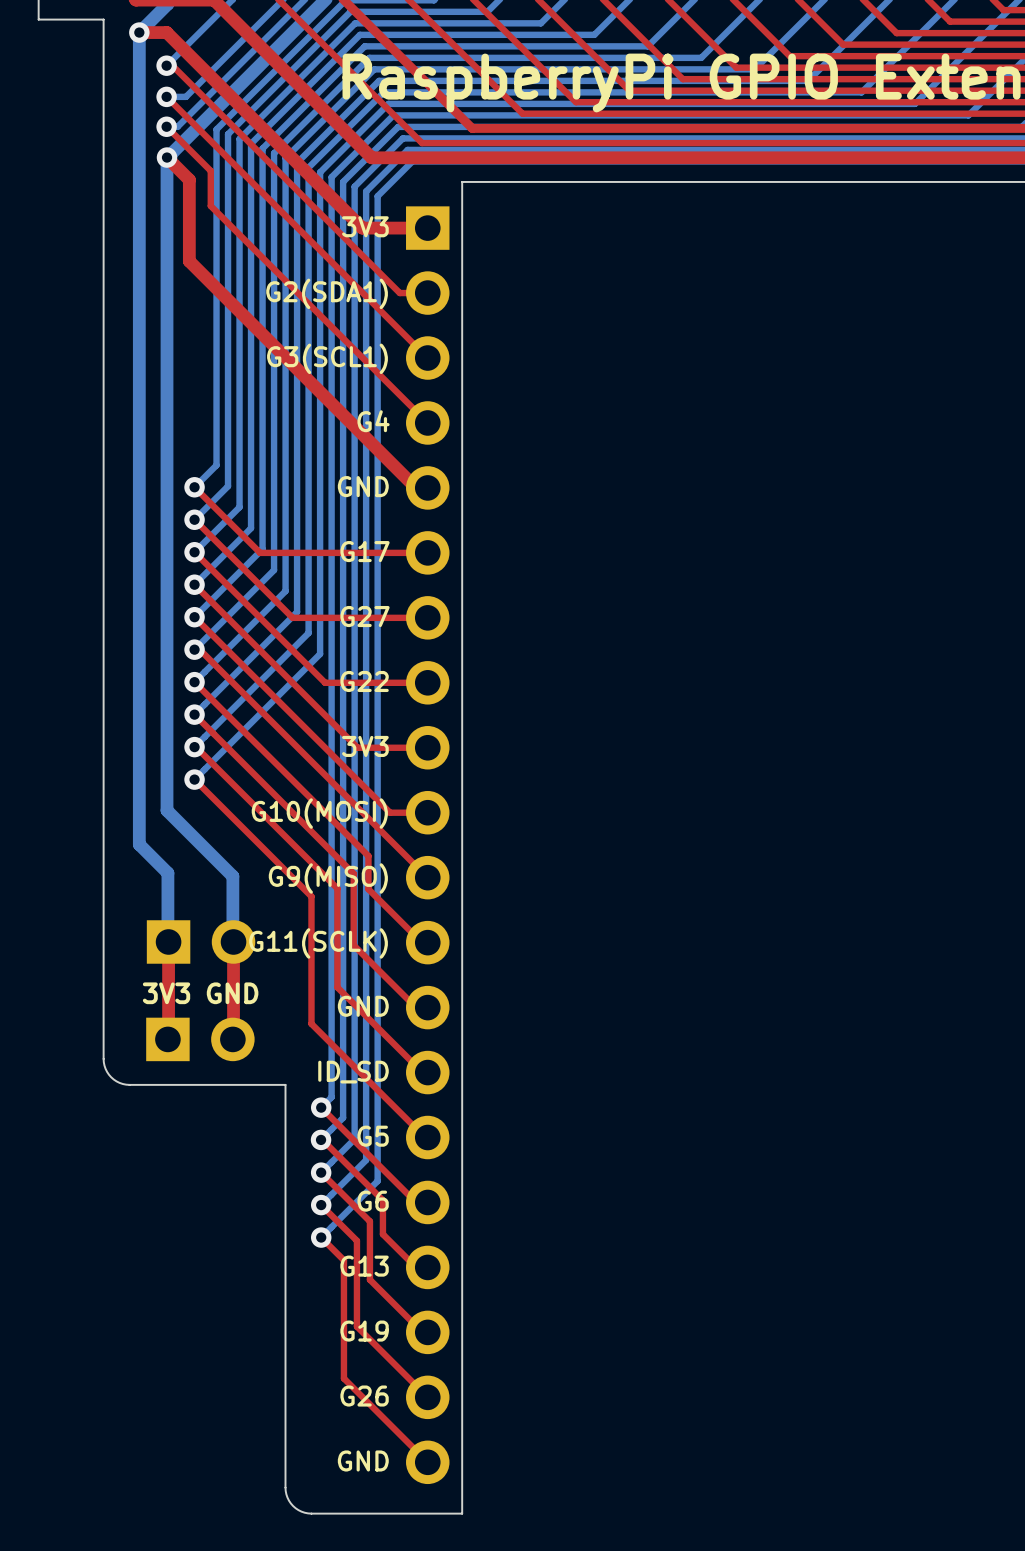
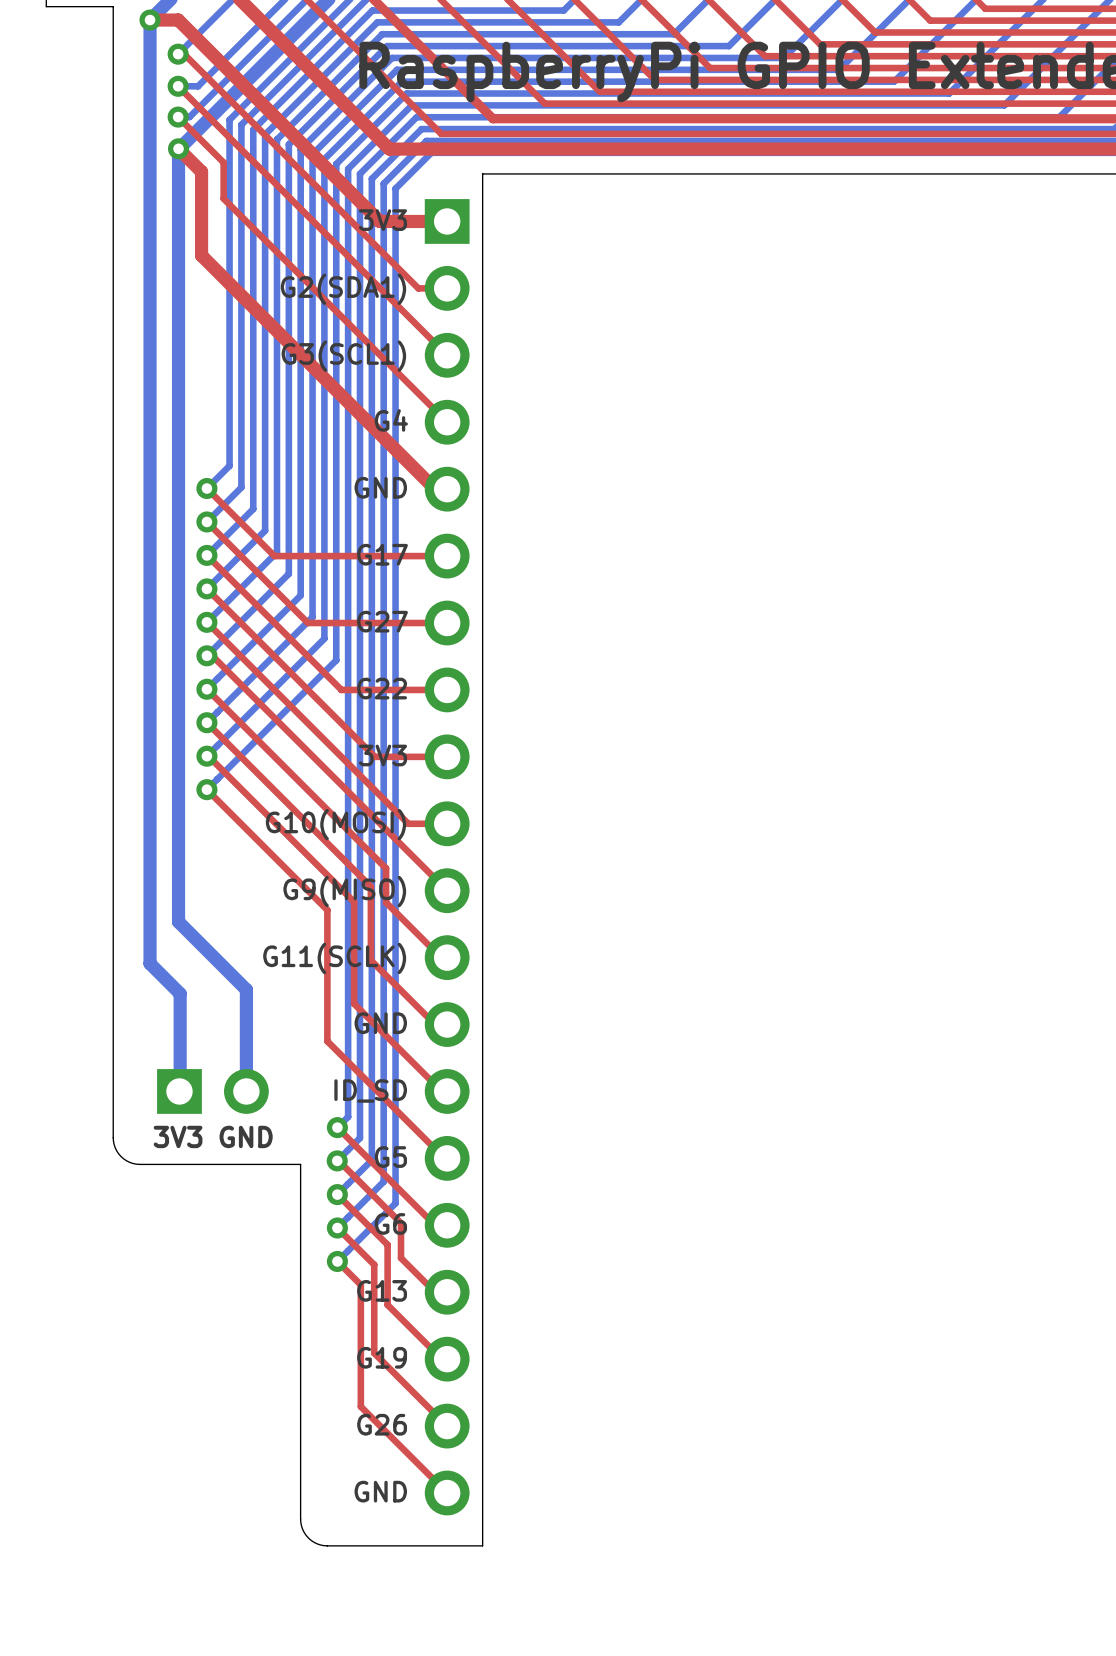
bottom track: (167, 810) (232, 876) (233, 941) -> (178, 821) (178, 921) (246, 989) (246, 1091)
bottom track: (139, 844) (167, 873) (168, 941) -> (150, 856) (150, 963) (180, 993) (179, 1091)
top track: (168, 941) (167, 1039) -> none
part: (201, 941) -> none
top track: (233, 941) (232, 1039) -> none
text position: 3V3 GND (200, 993) -> 3V3 GND (213, 1136)
part position: (200, 1039) -> (212, 1091)
board edge: (103, 1058) (108, 1074) (116, 1081) (126, 1084) (285, 1084) (285, 1143) -> (113, 1077) (113, 1141) (118, 1153) (129, 1162) (140, 1164) (300, 1164)

